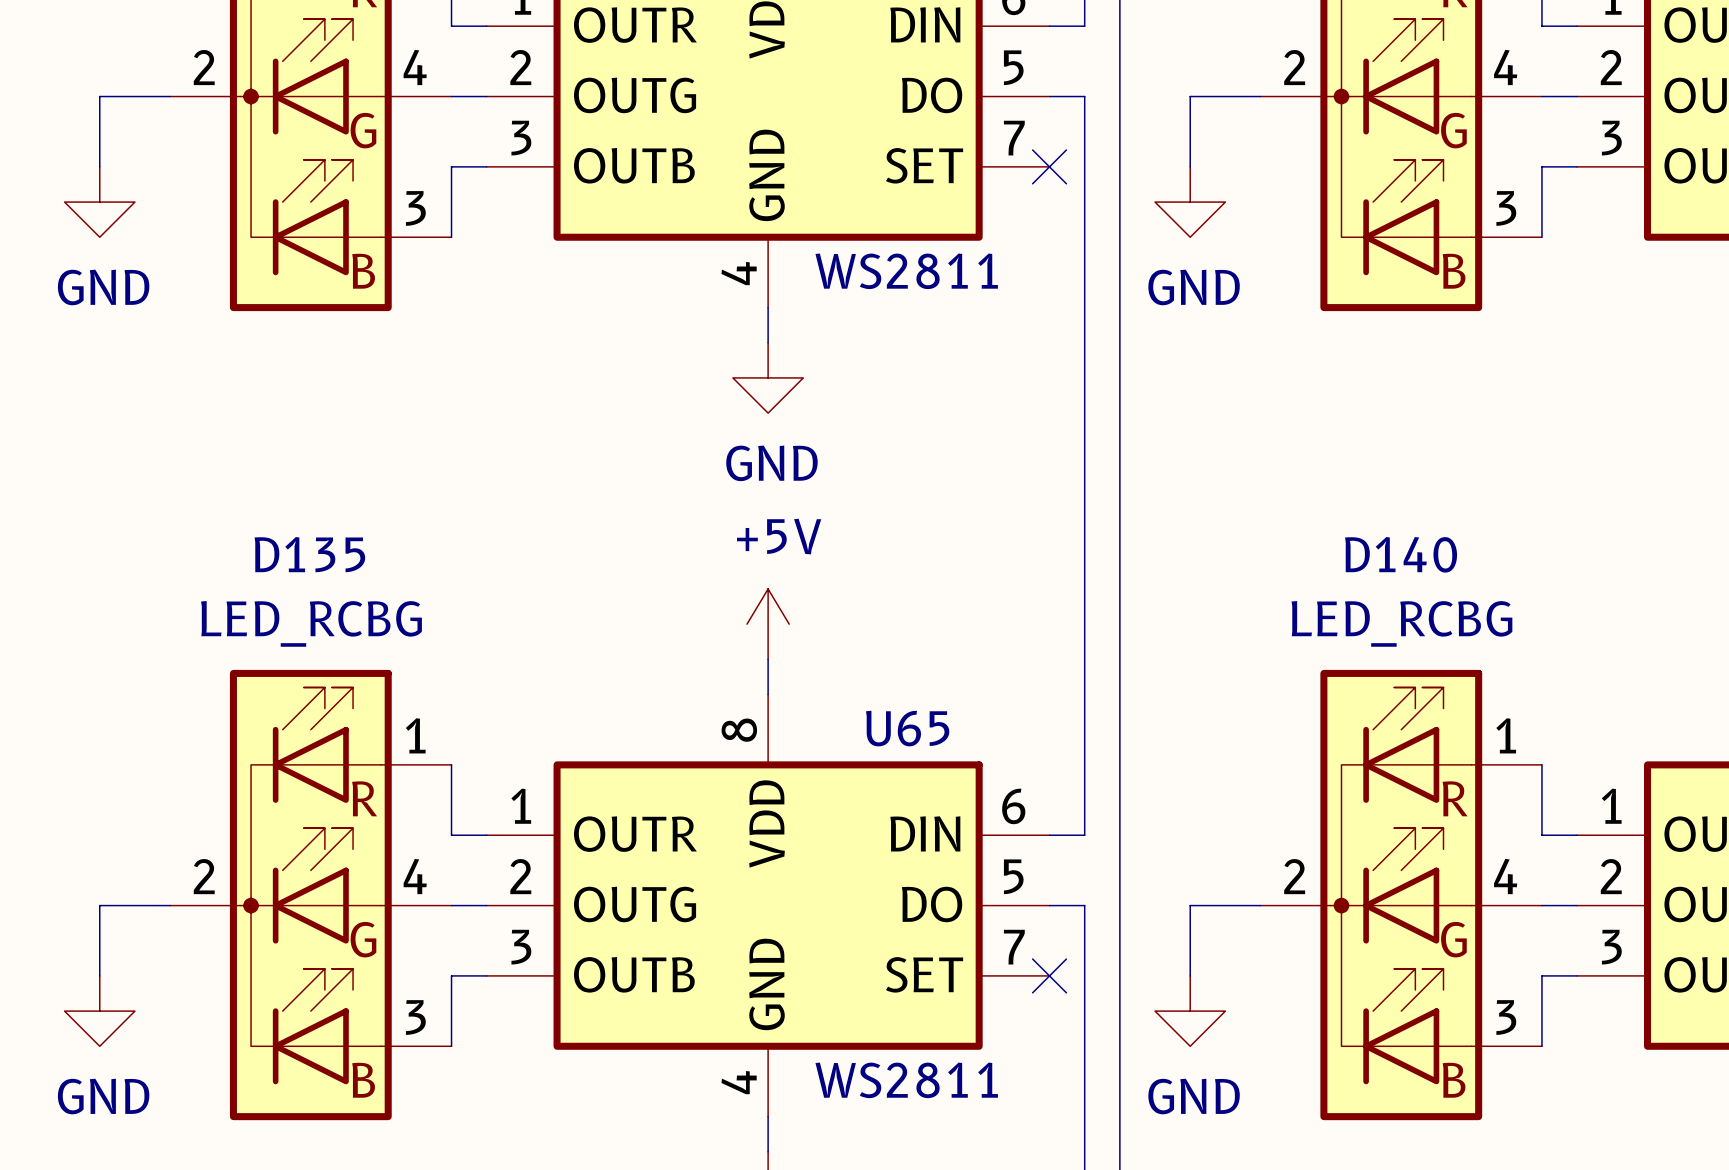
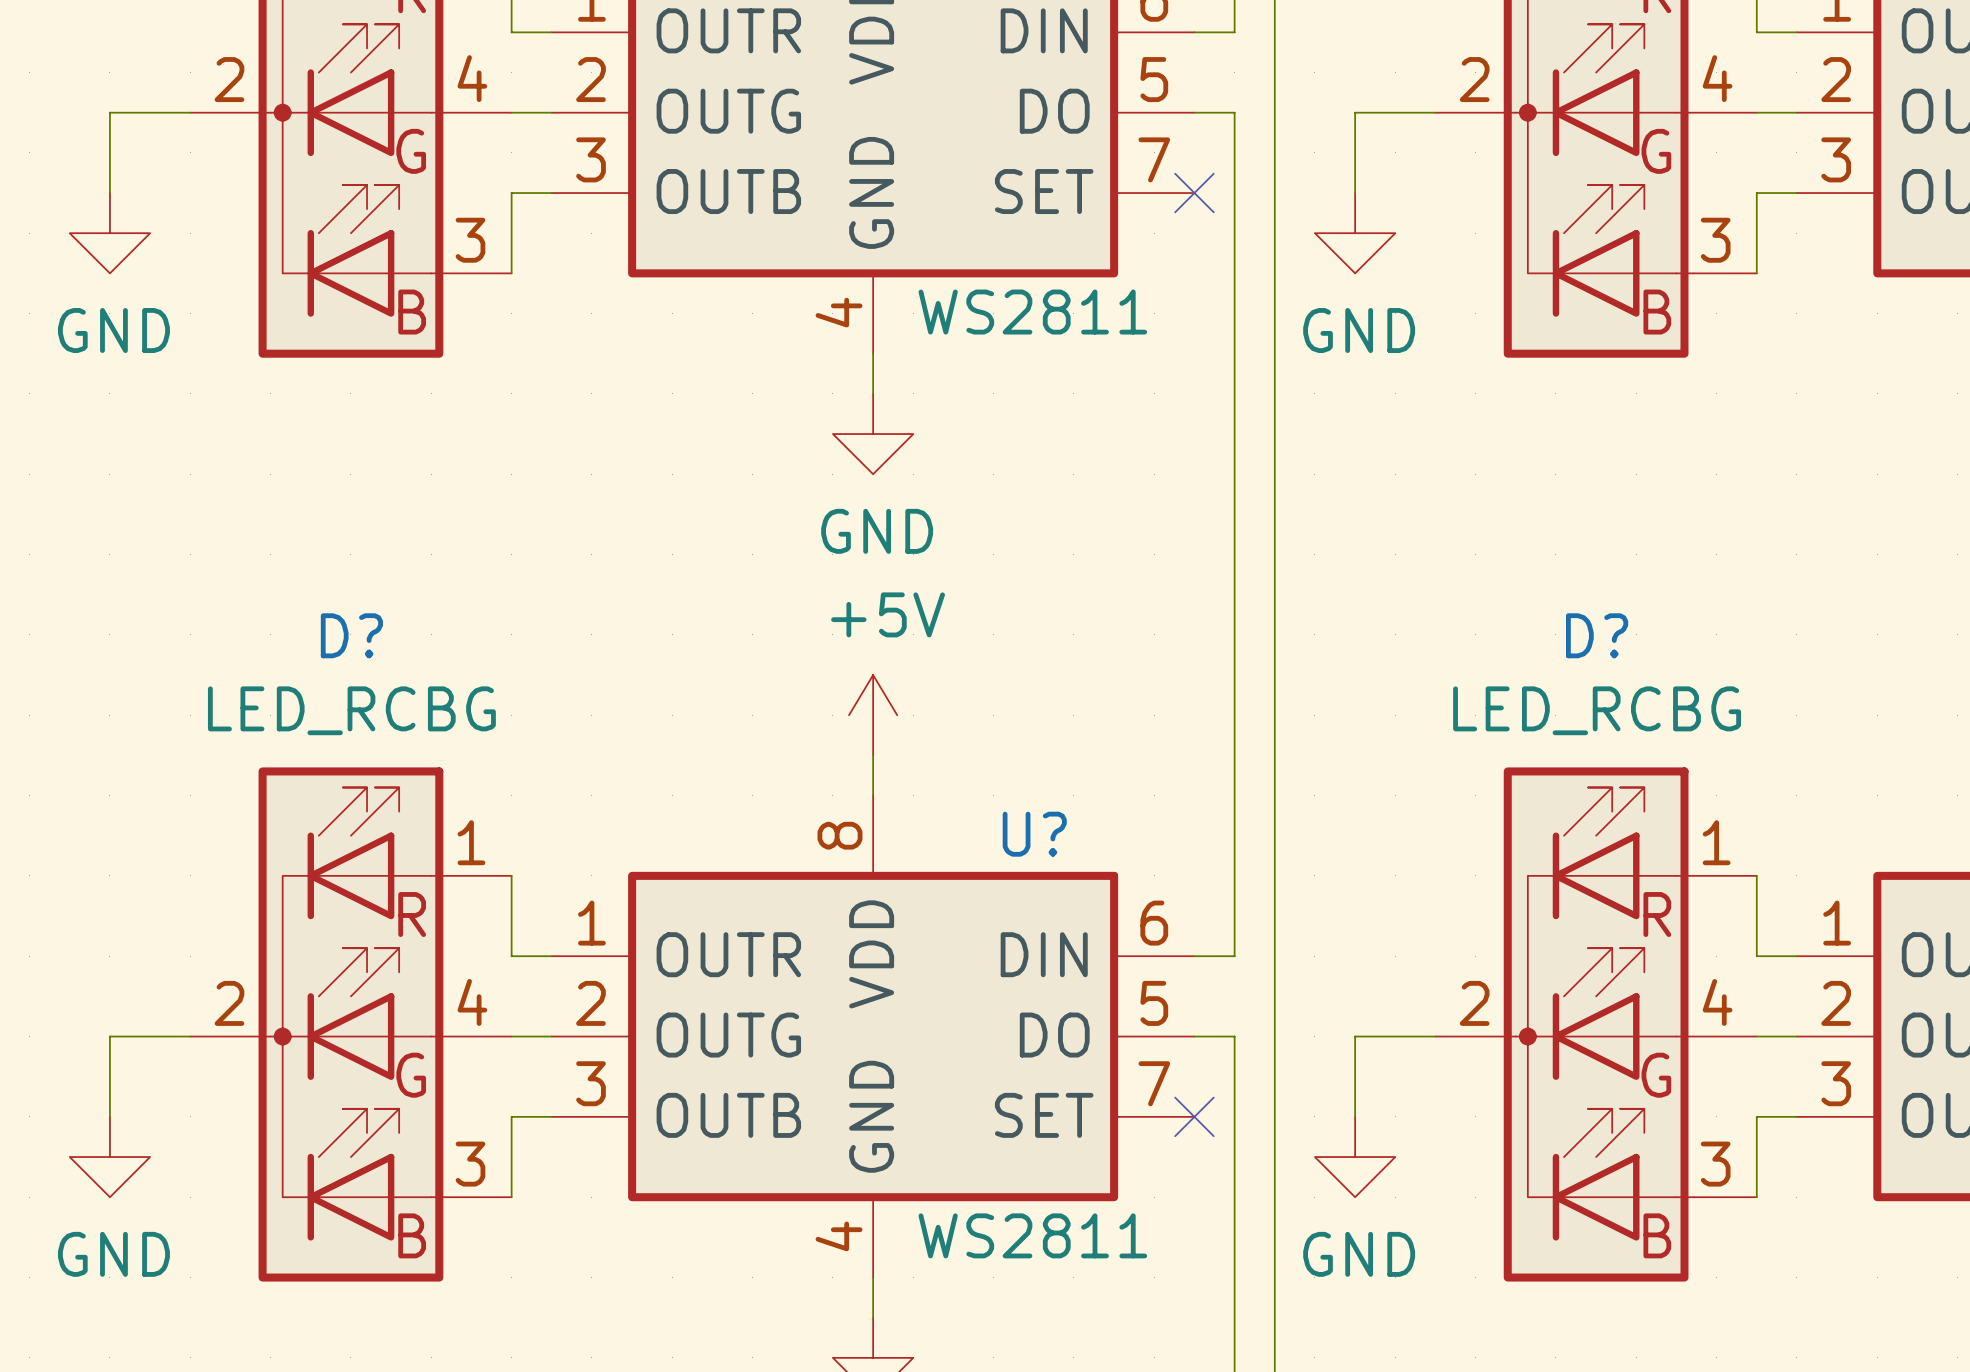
D135 name: D135 (309, 554) -> D? (351, 635)
D140 name: D140 (1401, 554) -> D? (1597, 635)
U65 name: U65 (907, 728) -> U? (1034, 834)

